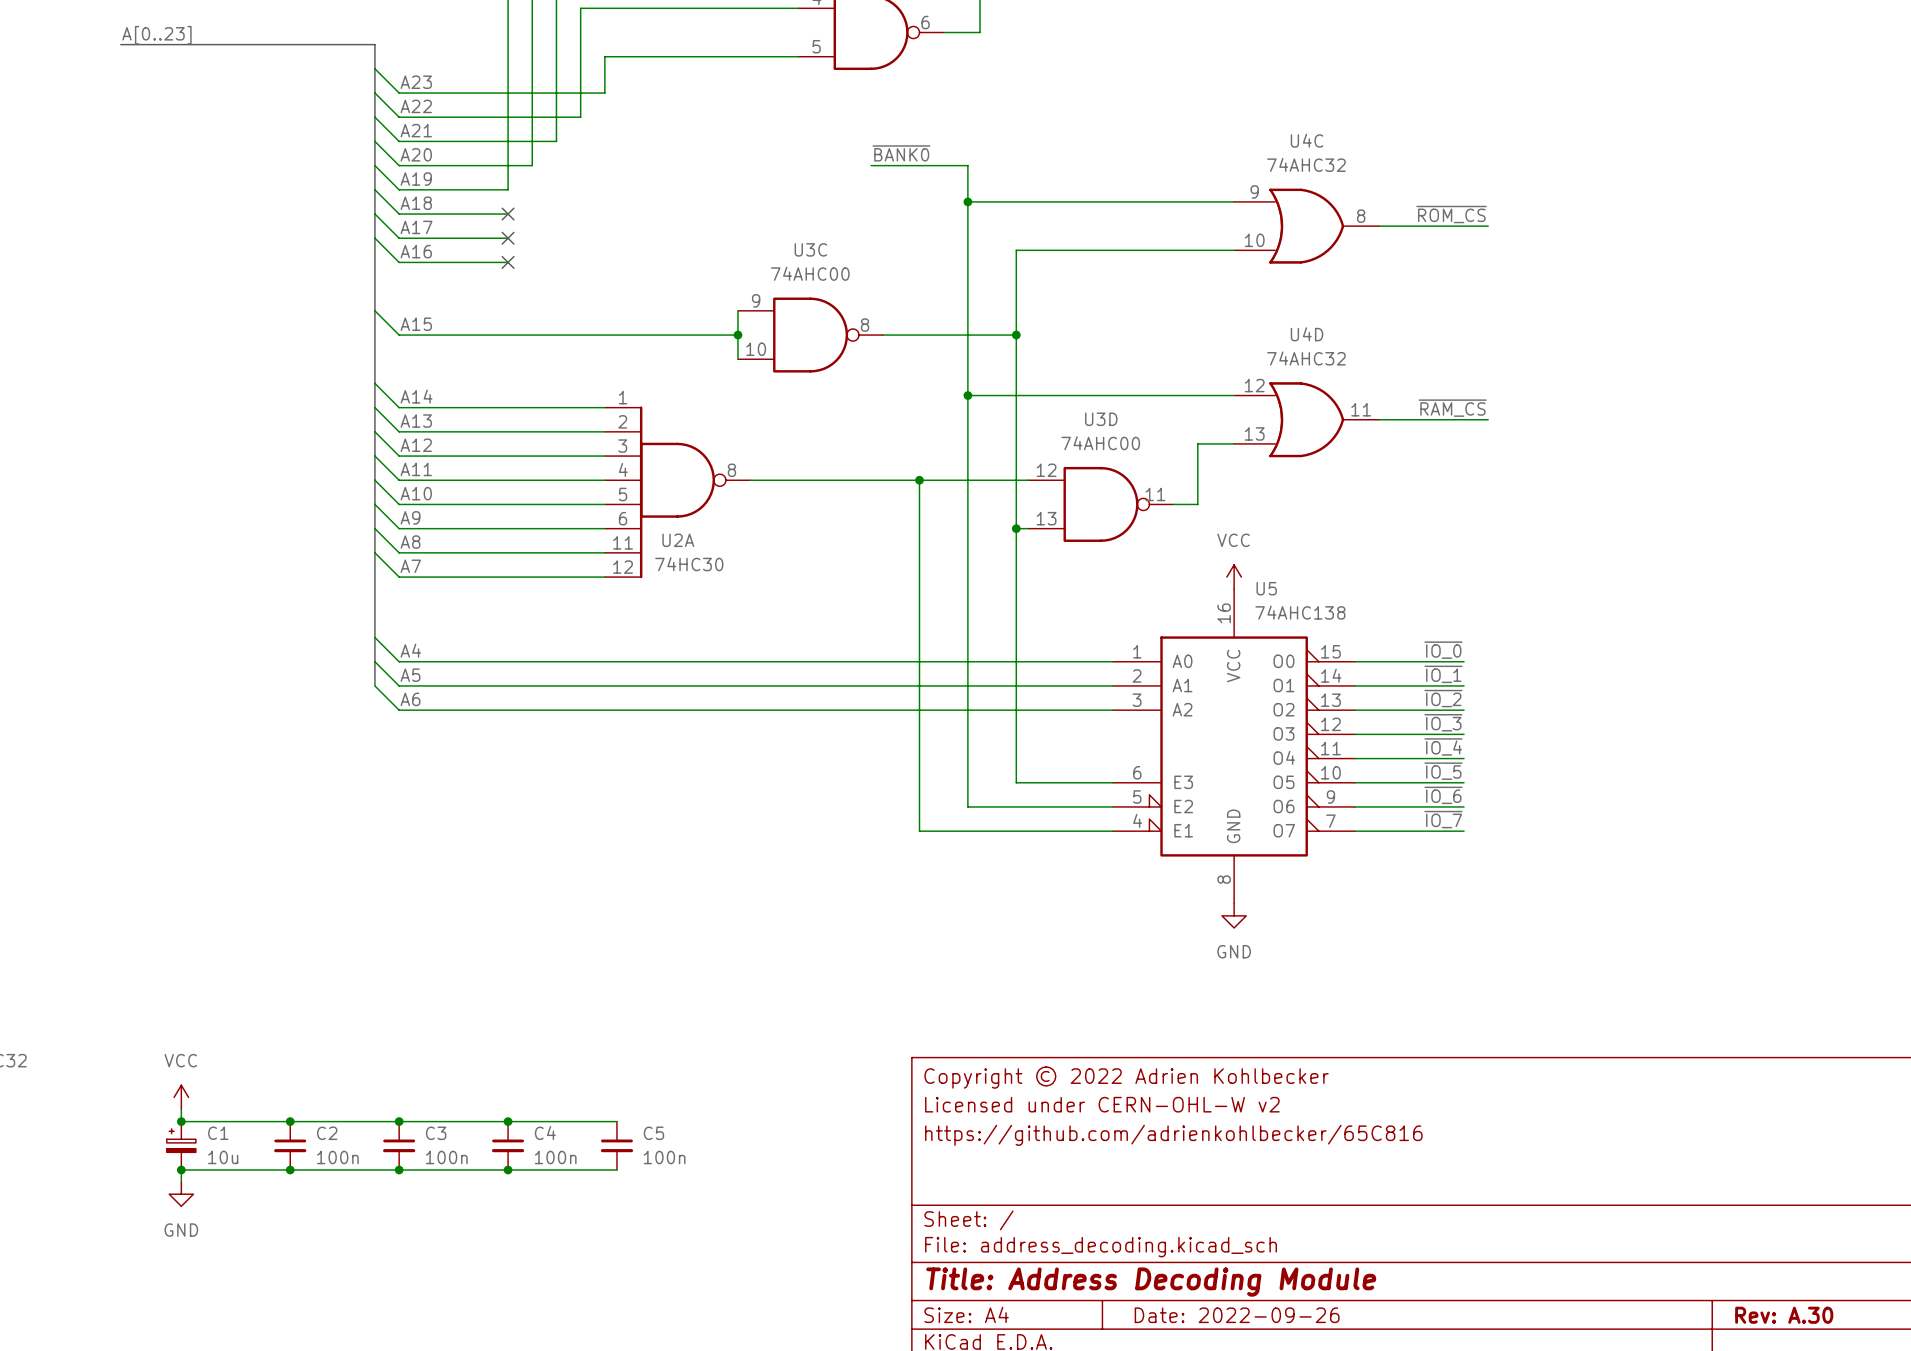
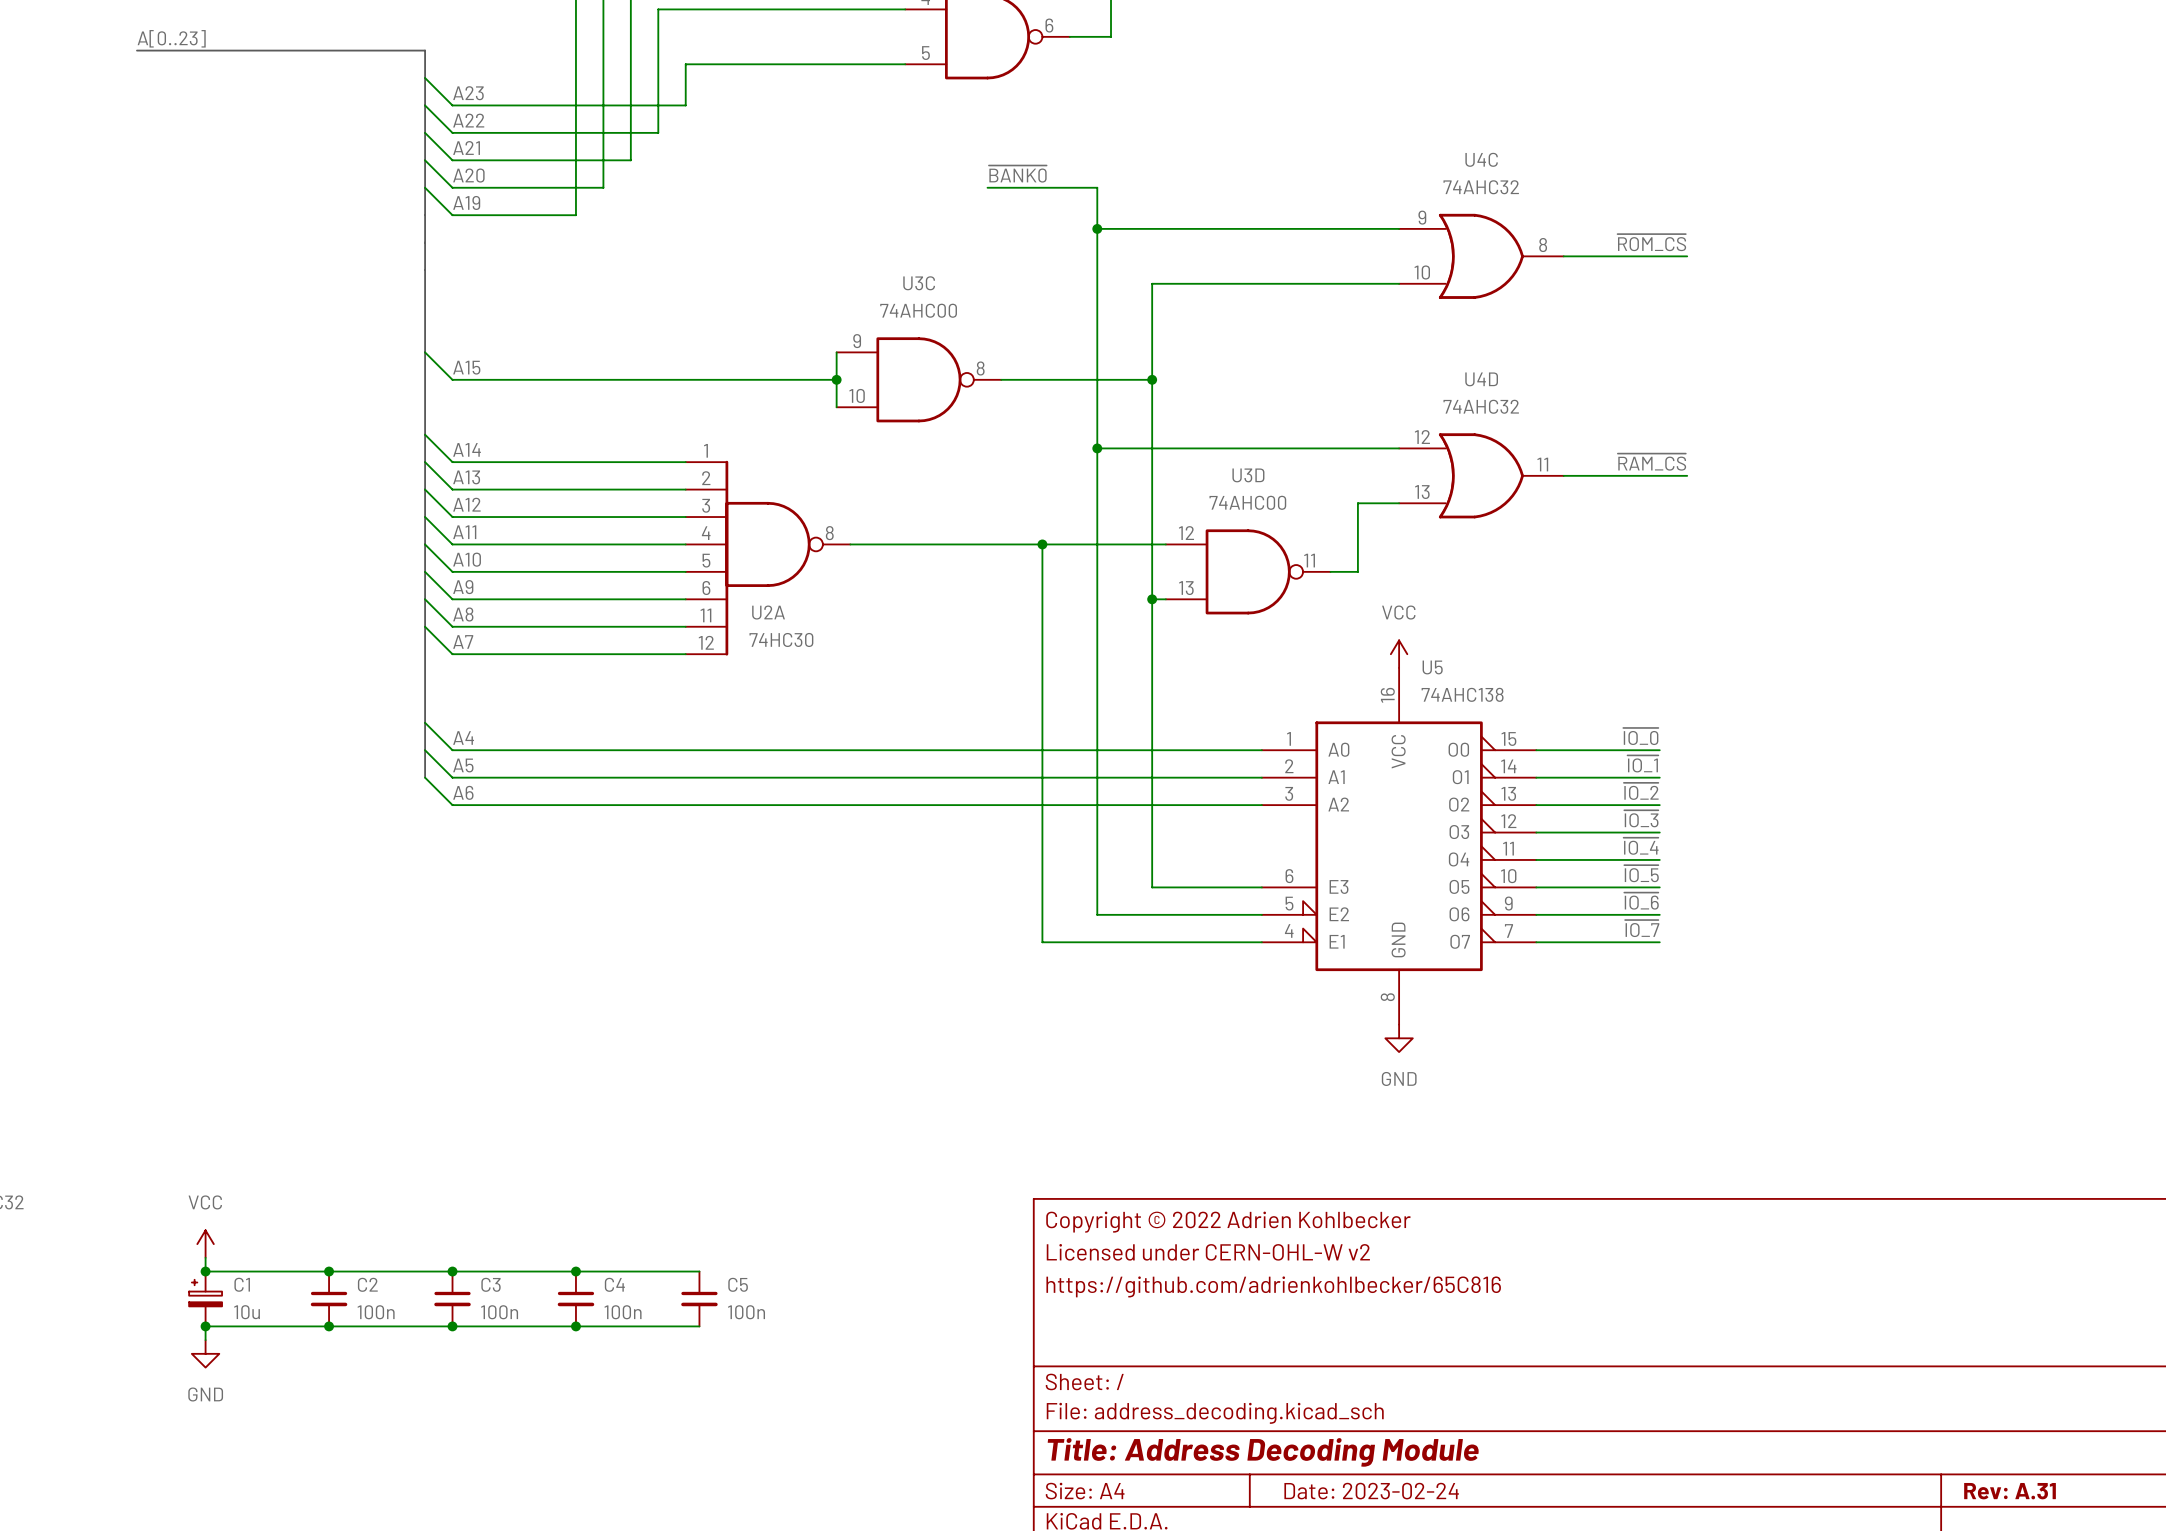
wire: (374, 189) (399, 214) (508, 214) -> none
label: A18 (416, 203) -> none
wire: (374, 214) (399, 238) (508, 238) -> none
no-connect mark: (508, 214) -> none
label: A17 (416, 227) -> none
wire: (374, 238) (399, 262) (508, 262) -> none
no-connect mark: (508, 238) -> none
label: A16 (416, 251) -> none
no-connect mark: (508, 262) -> none
title block: Date: 2022-09-26 (1237, 1315) -> Date: 2023-02-24 (1371, 1491)
title block: Rev: A.30 (1784, 1315) -> Rev: A.31 (2010, 1491)

